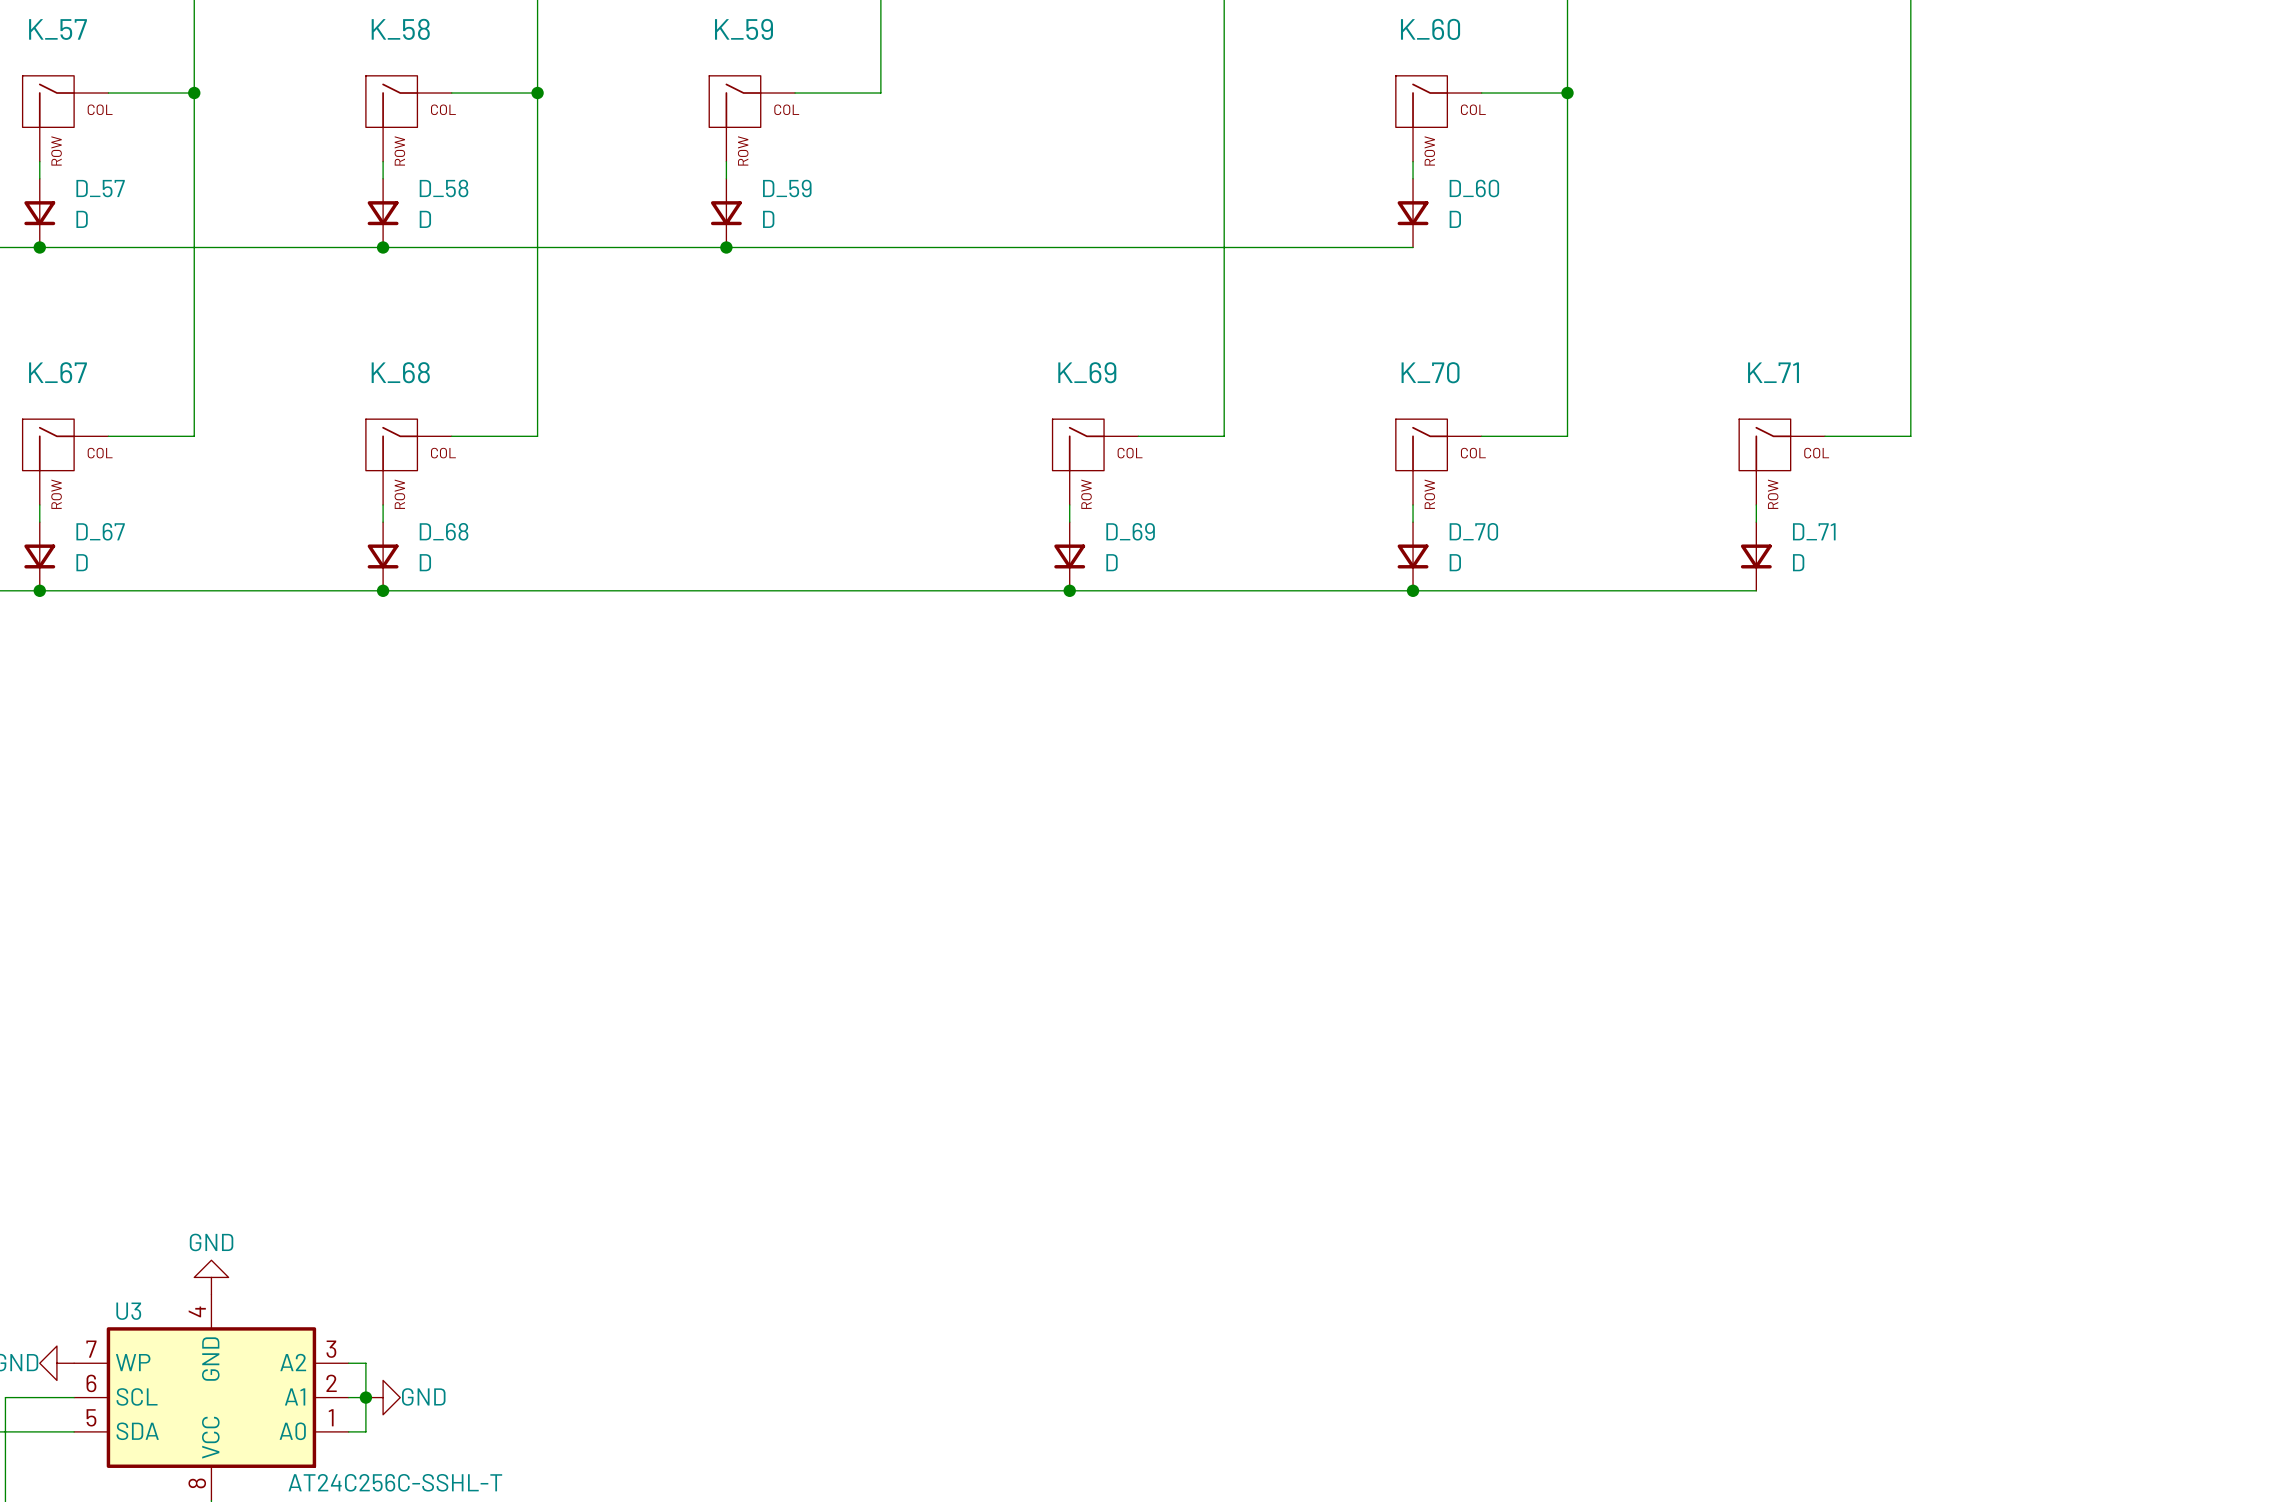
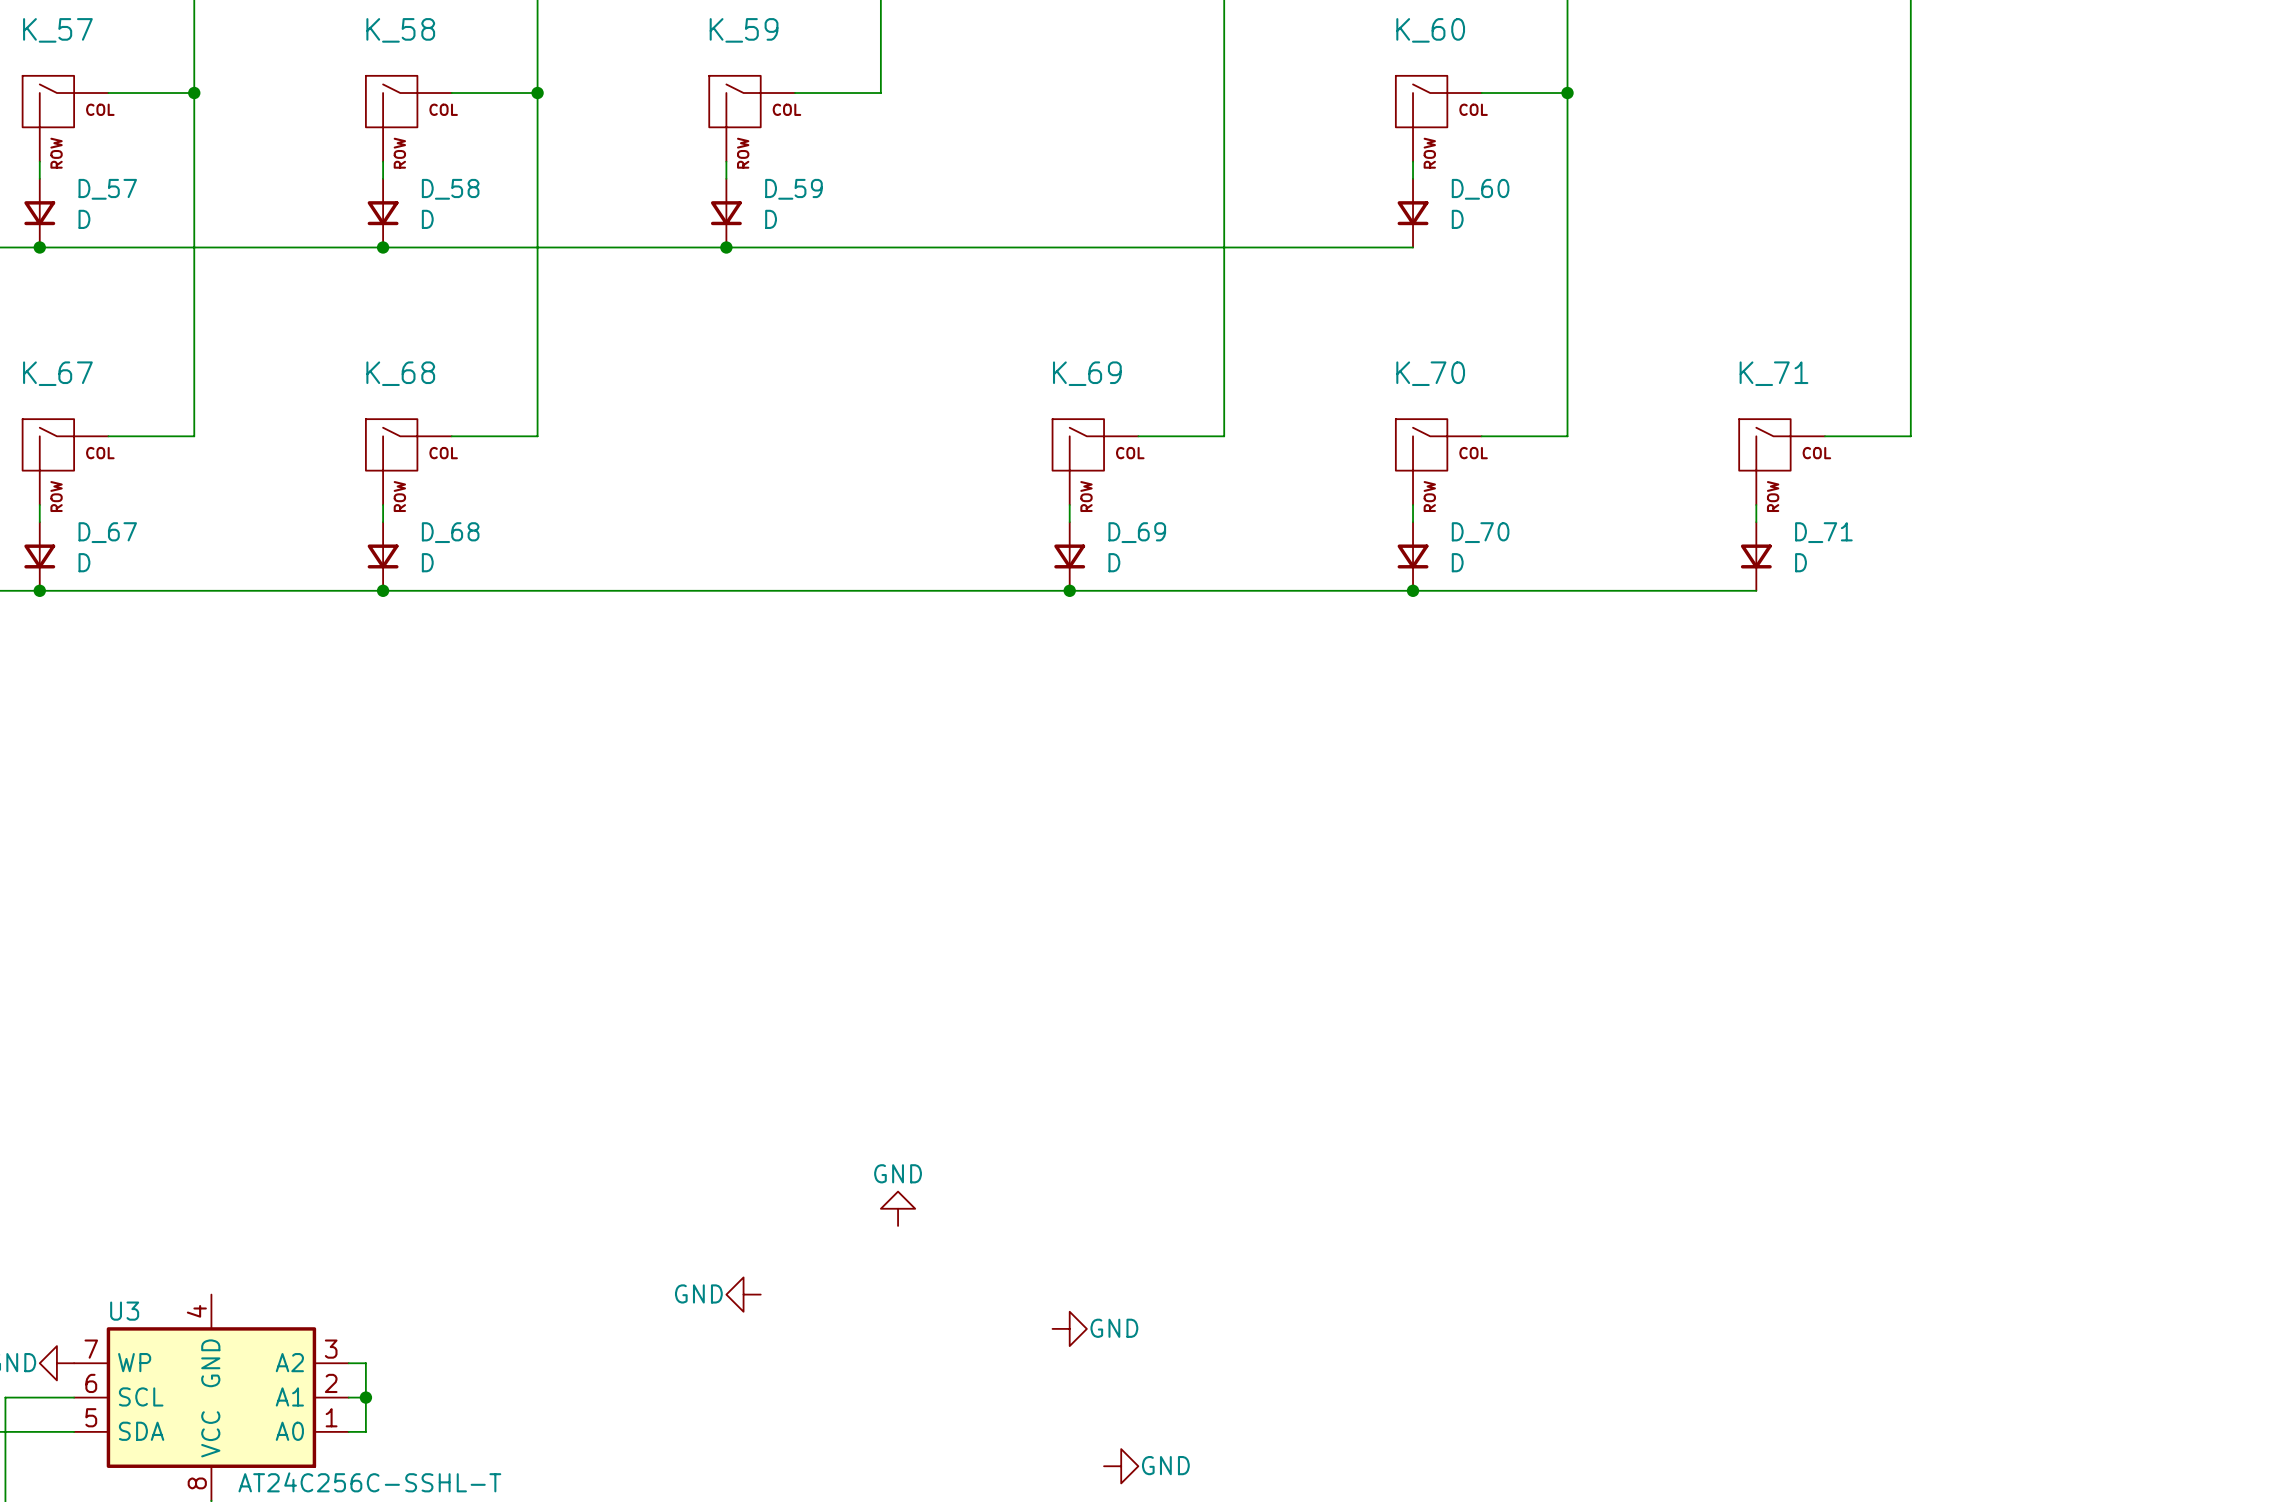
power symbol: none -> GND (898, 1208)
power symbol: GND (211, 1277) -> none
power symbol: none -> GND (743, 1294)
power symbol: none -> GND (1069, 1328)
power symbol: GND (383, 1397) -> none
power symbol: none -> GND (1121, 1466)

